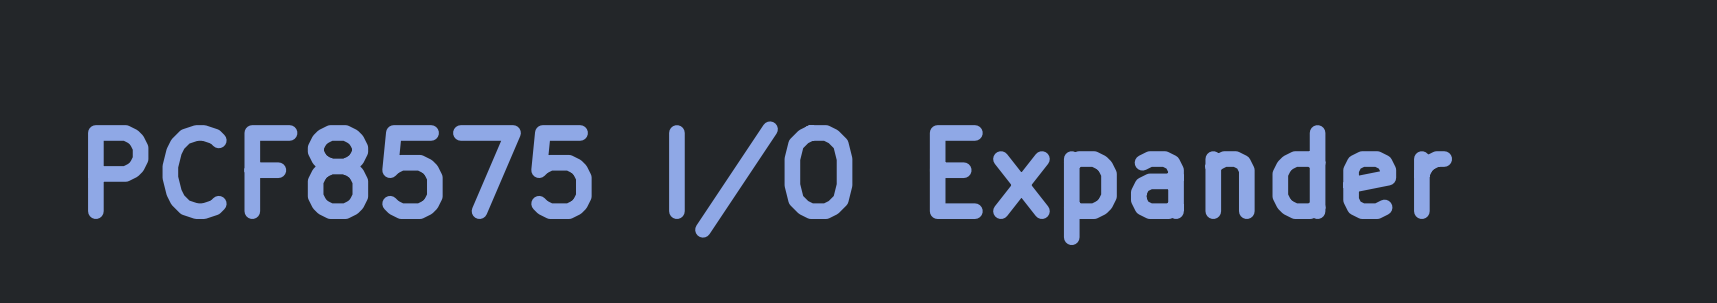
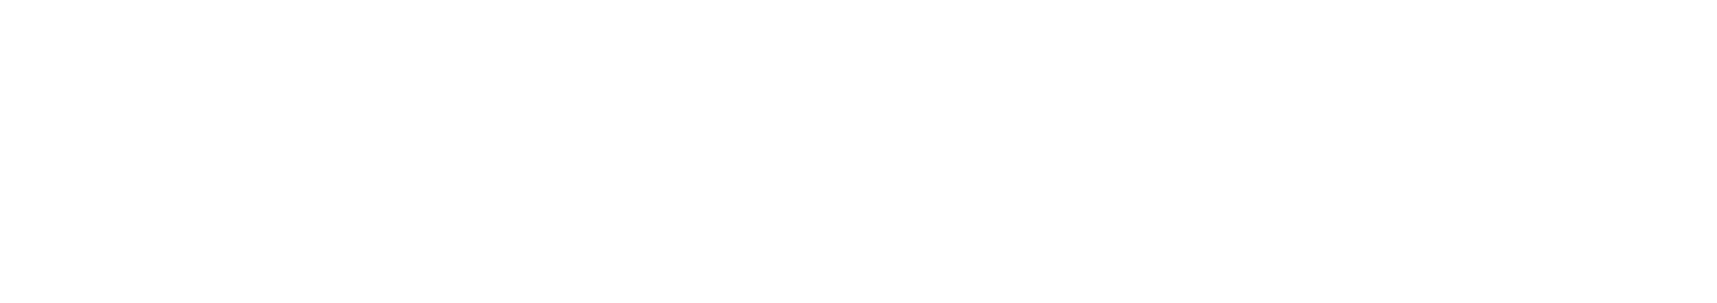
text: PCF8575 I/O Expander (770, 183) -> none

